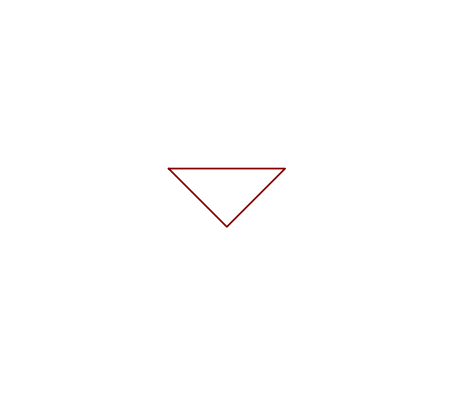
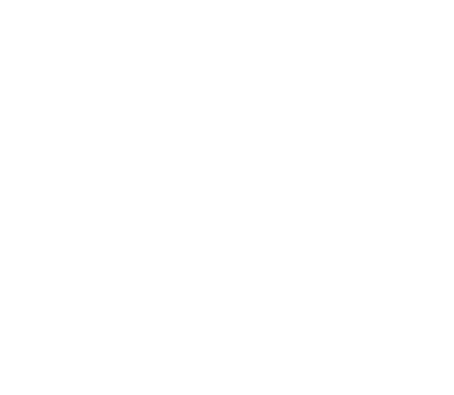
power symbol: (226, 197) -> none

